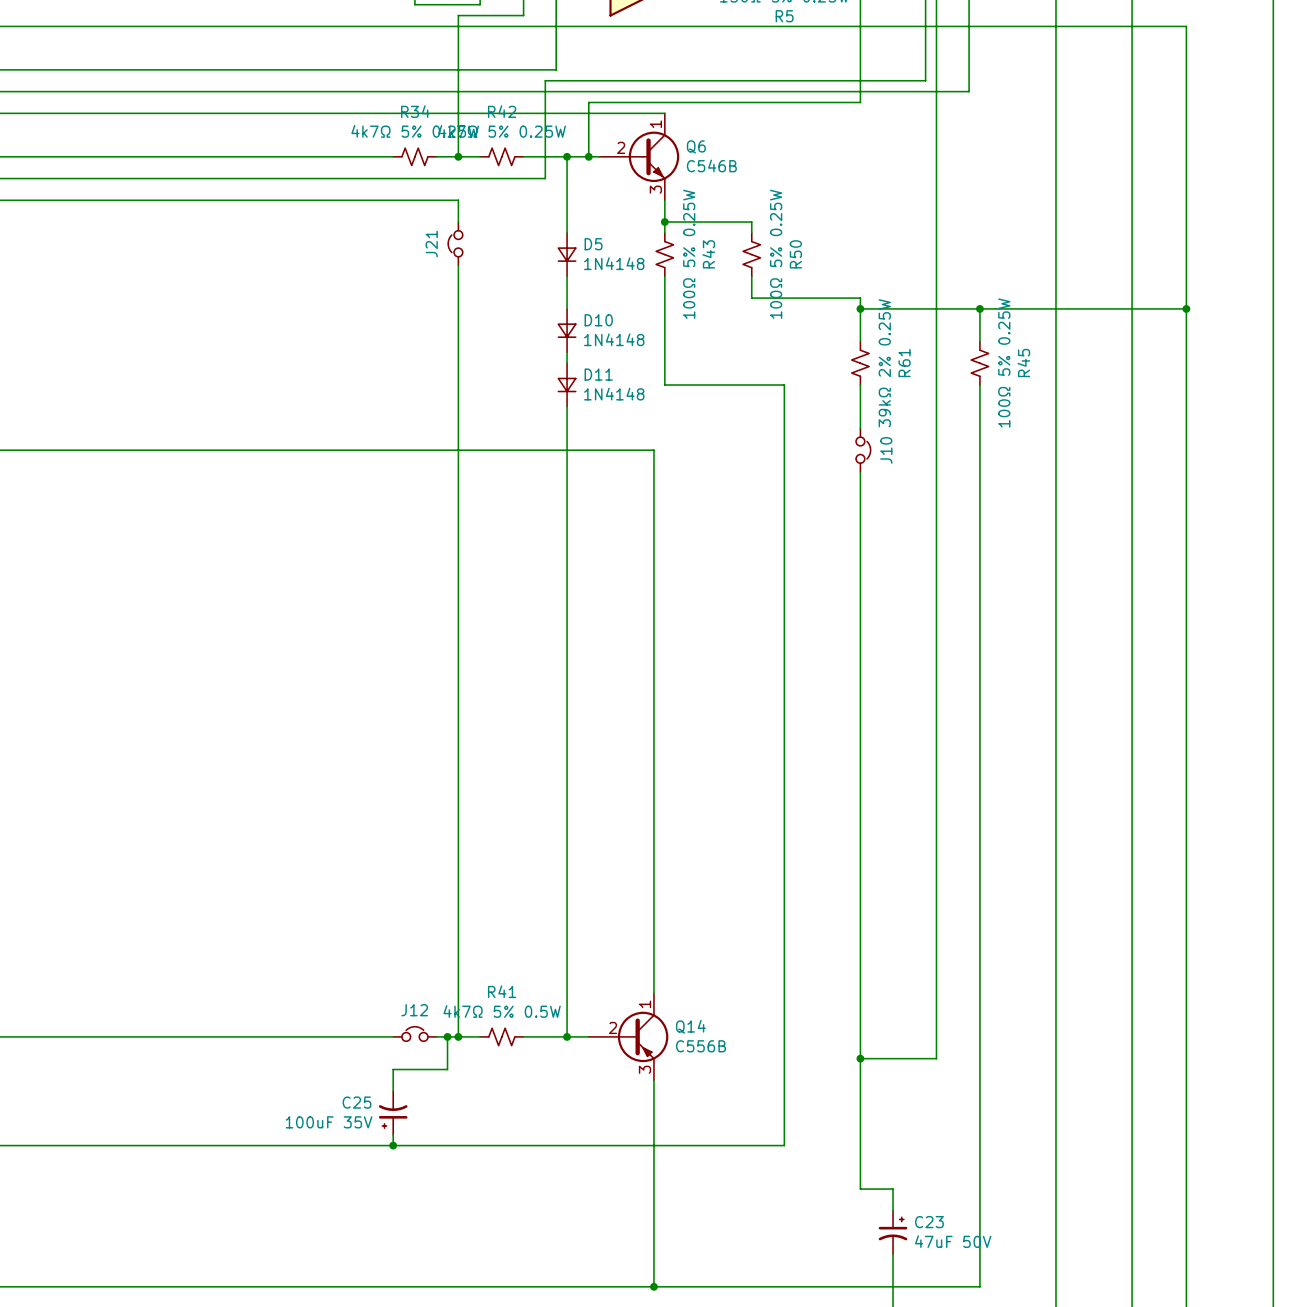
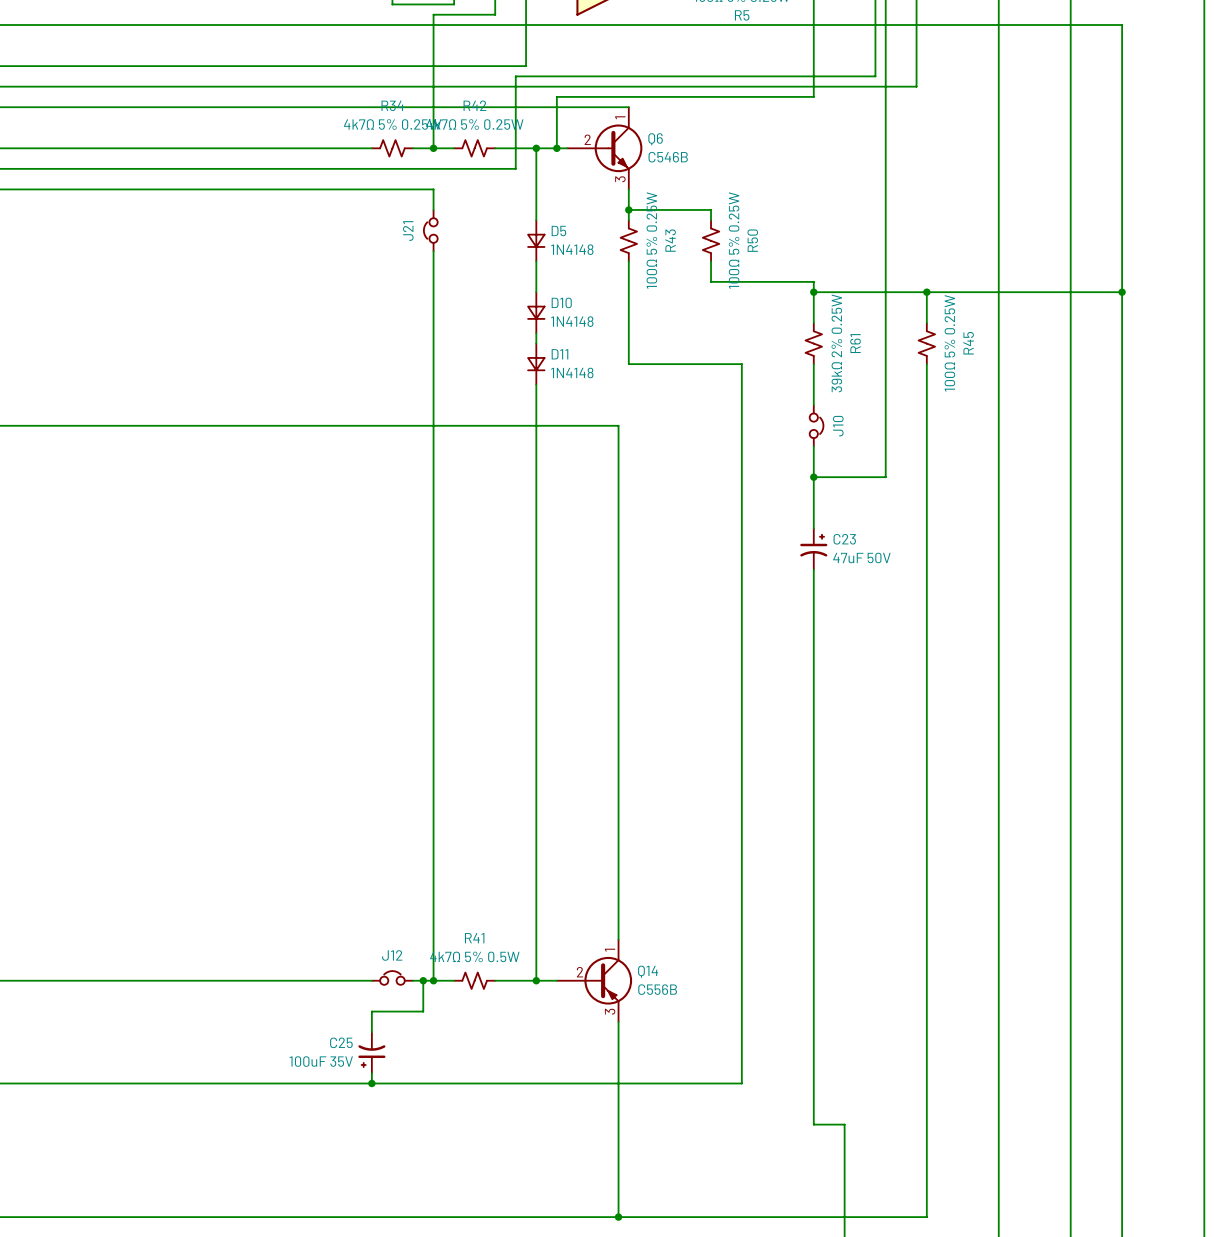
junction: none -> (813, 477)
wire: (936, 504) (936, 1058) (860, 1058) -> (885, 477) (813, 477)
junction: (860, 1058) -> none
C23 position: (893, 1232) -> (813, 549)

